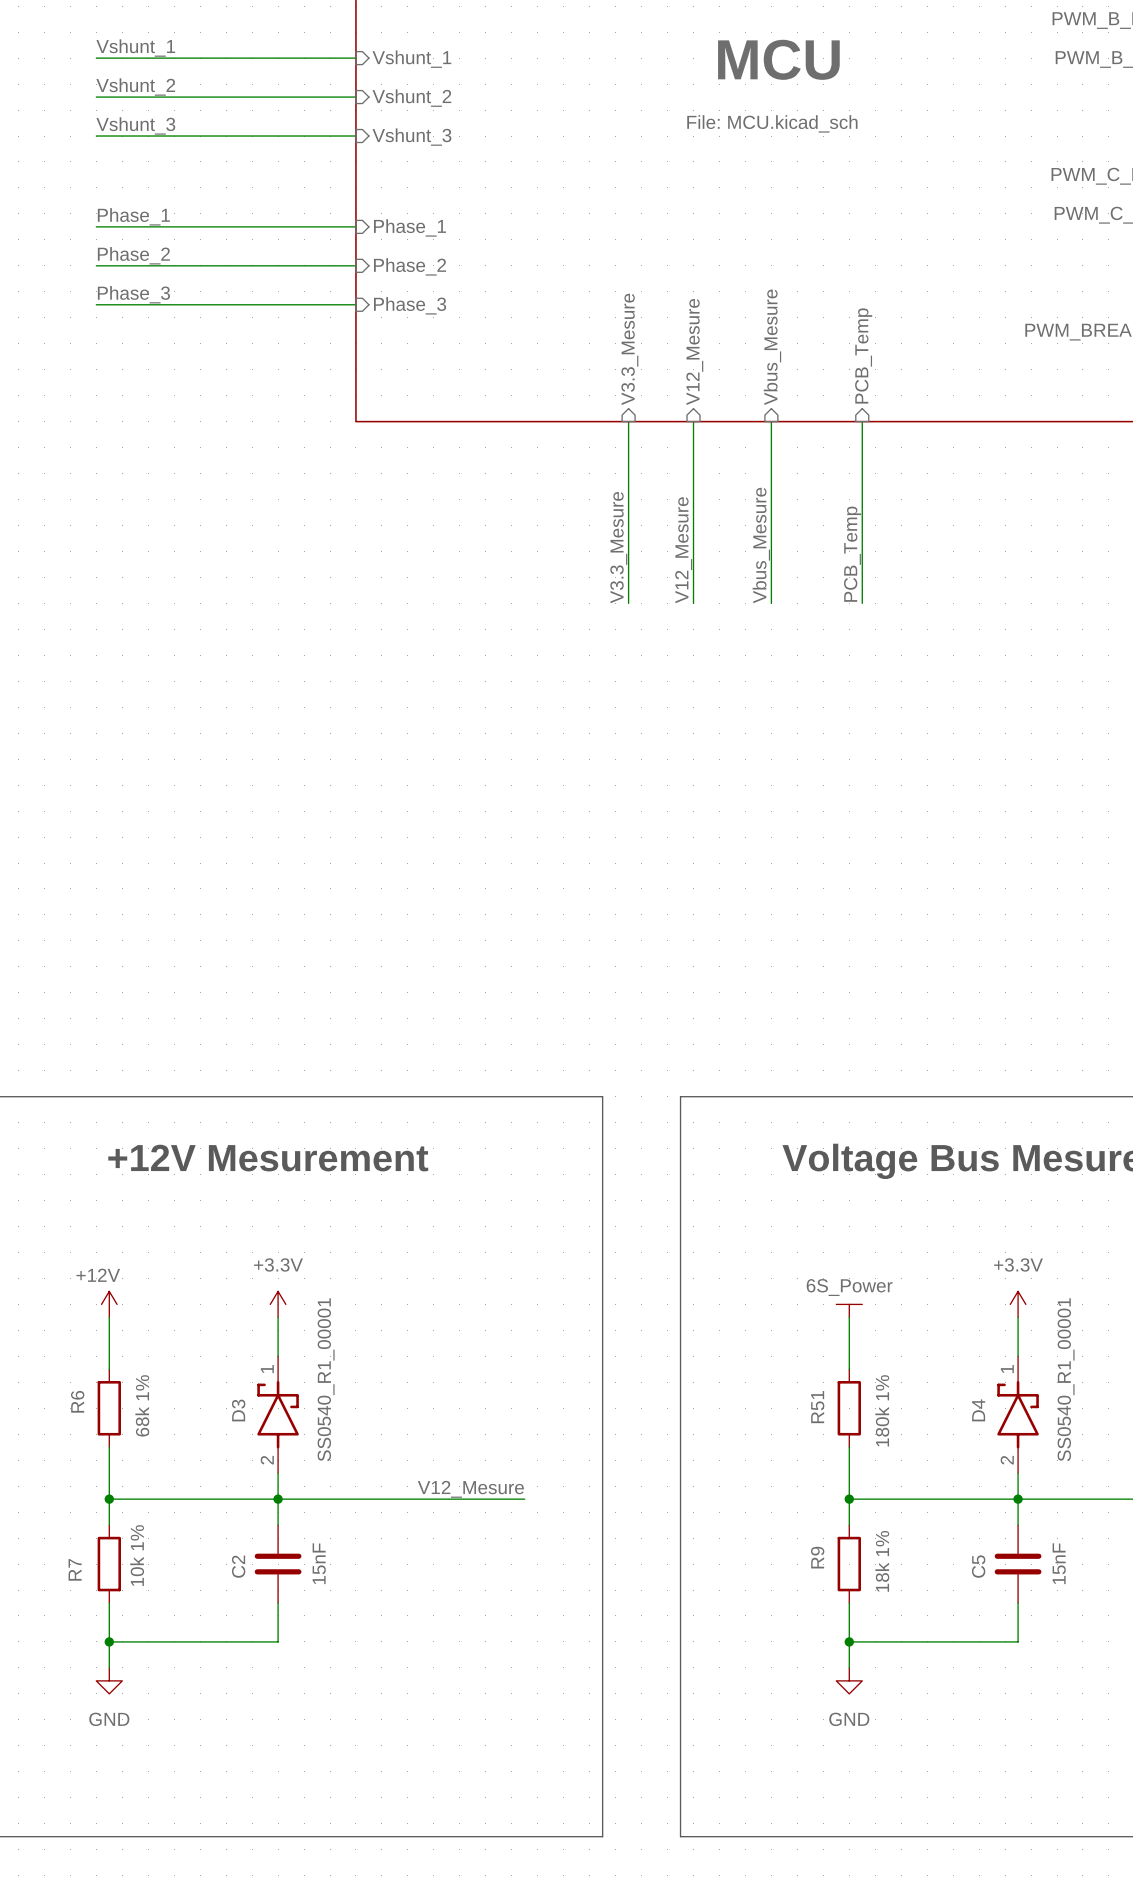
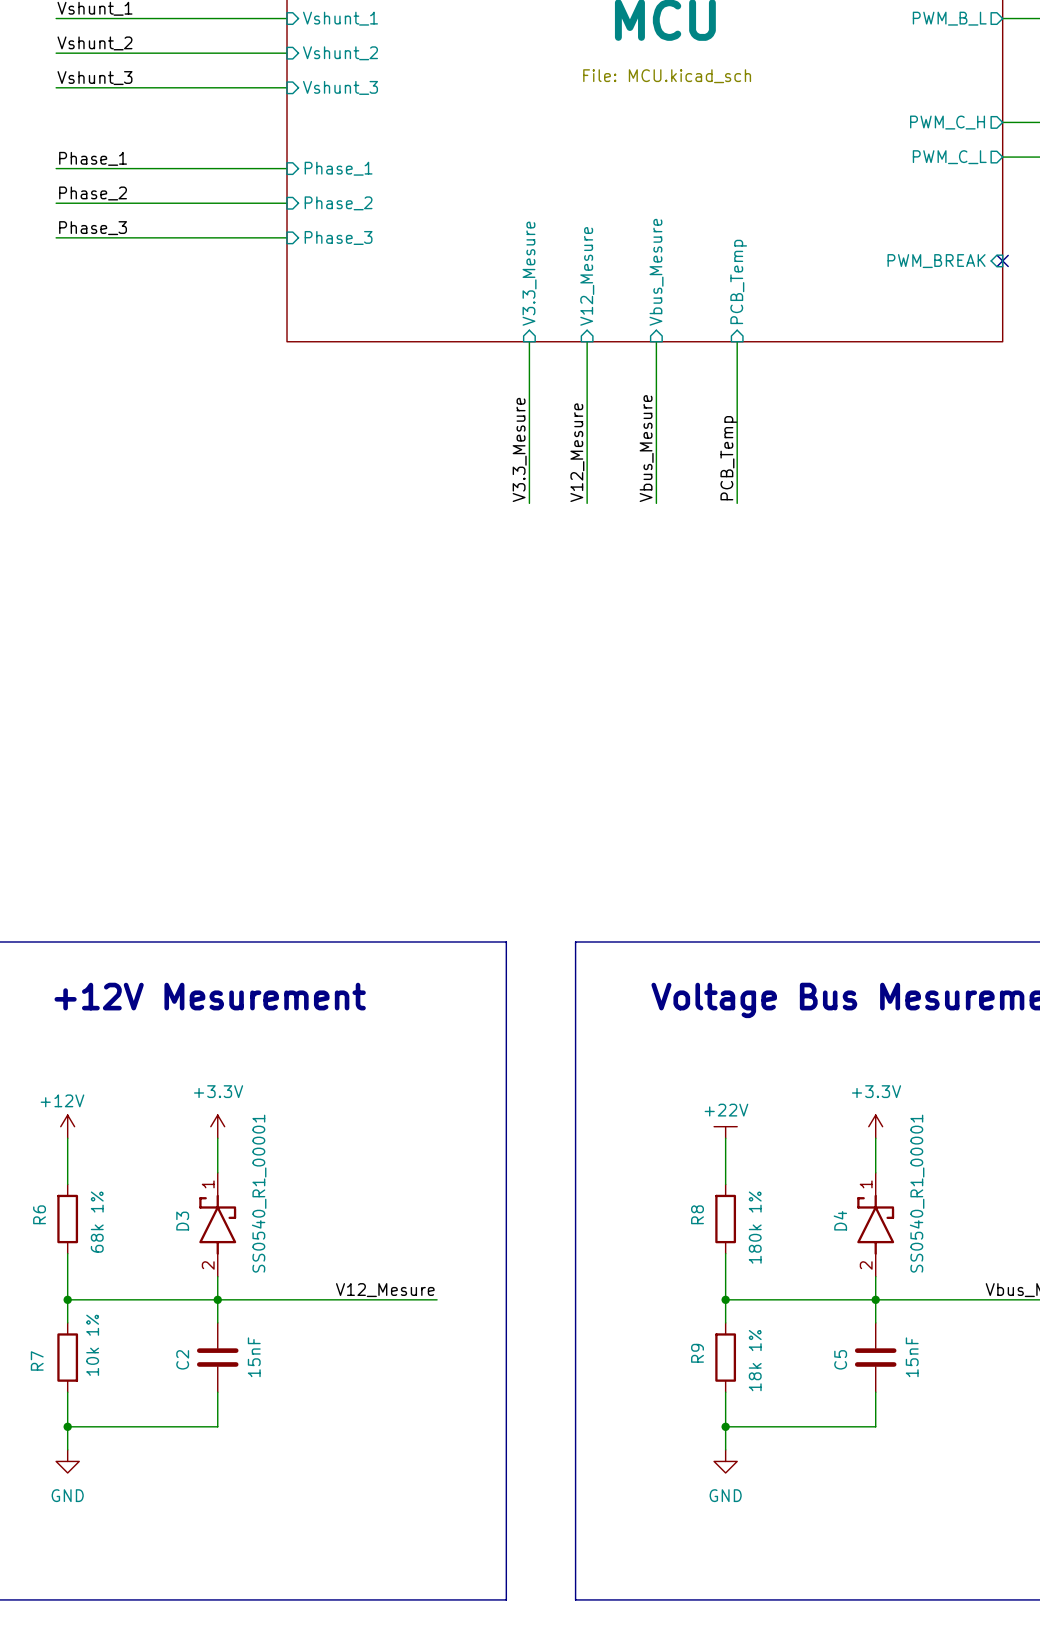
power symbol: 6S_Power (849, 1310) -> +22V (725, 1132)
R51 name: R51 (817, 1407) -> R8 (697, 1214)

